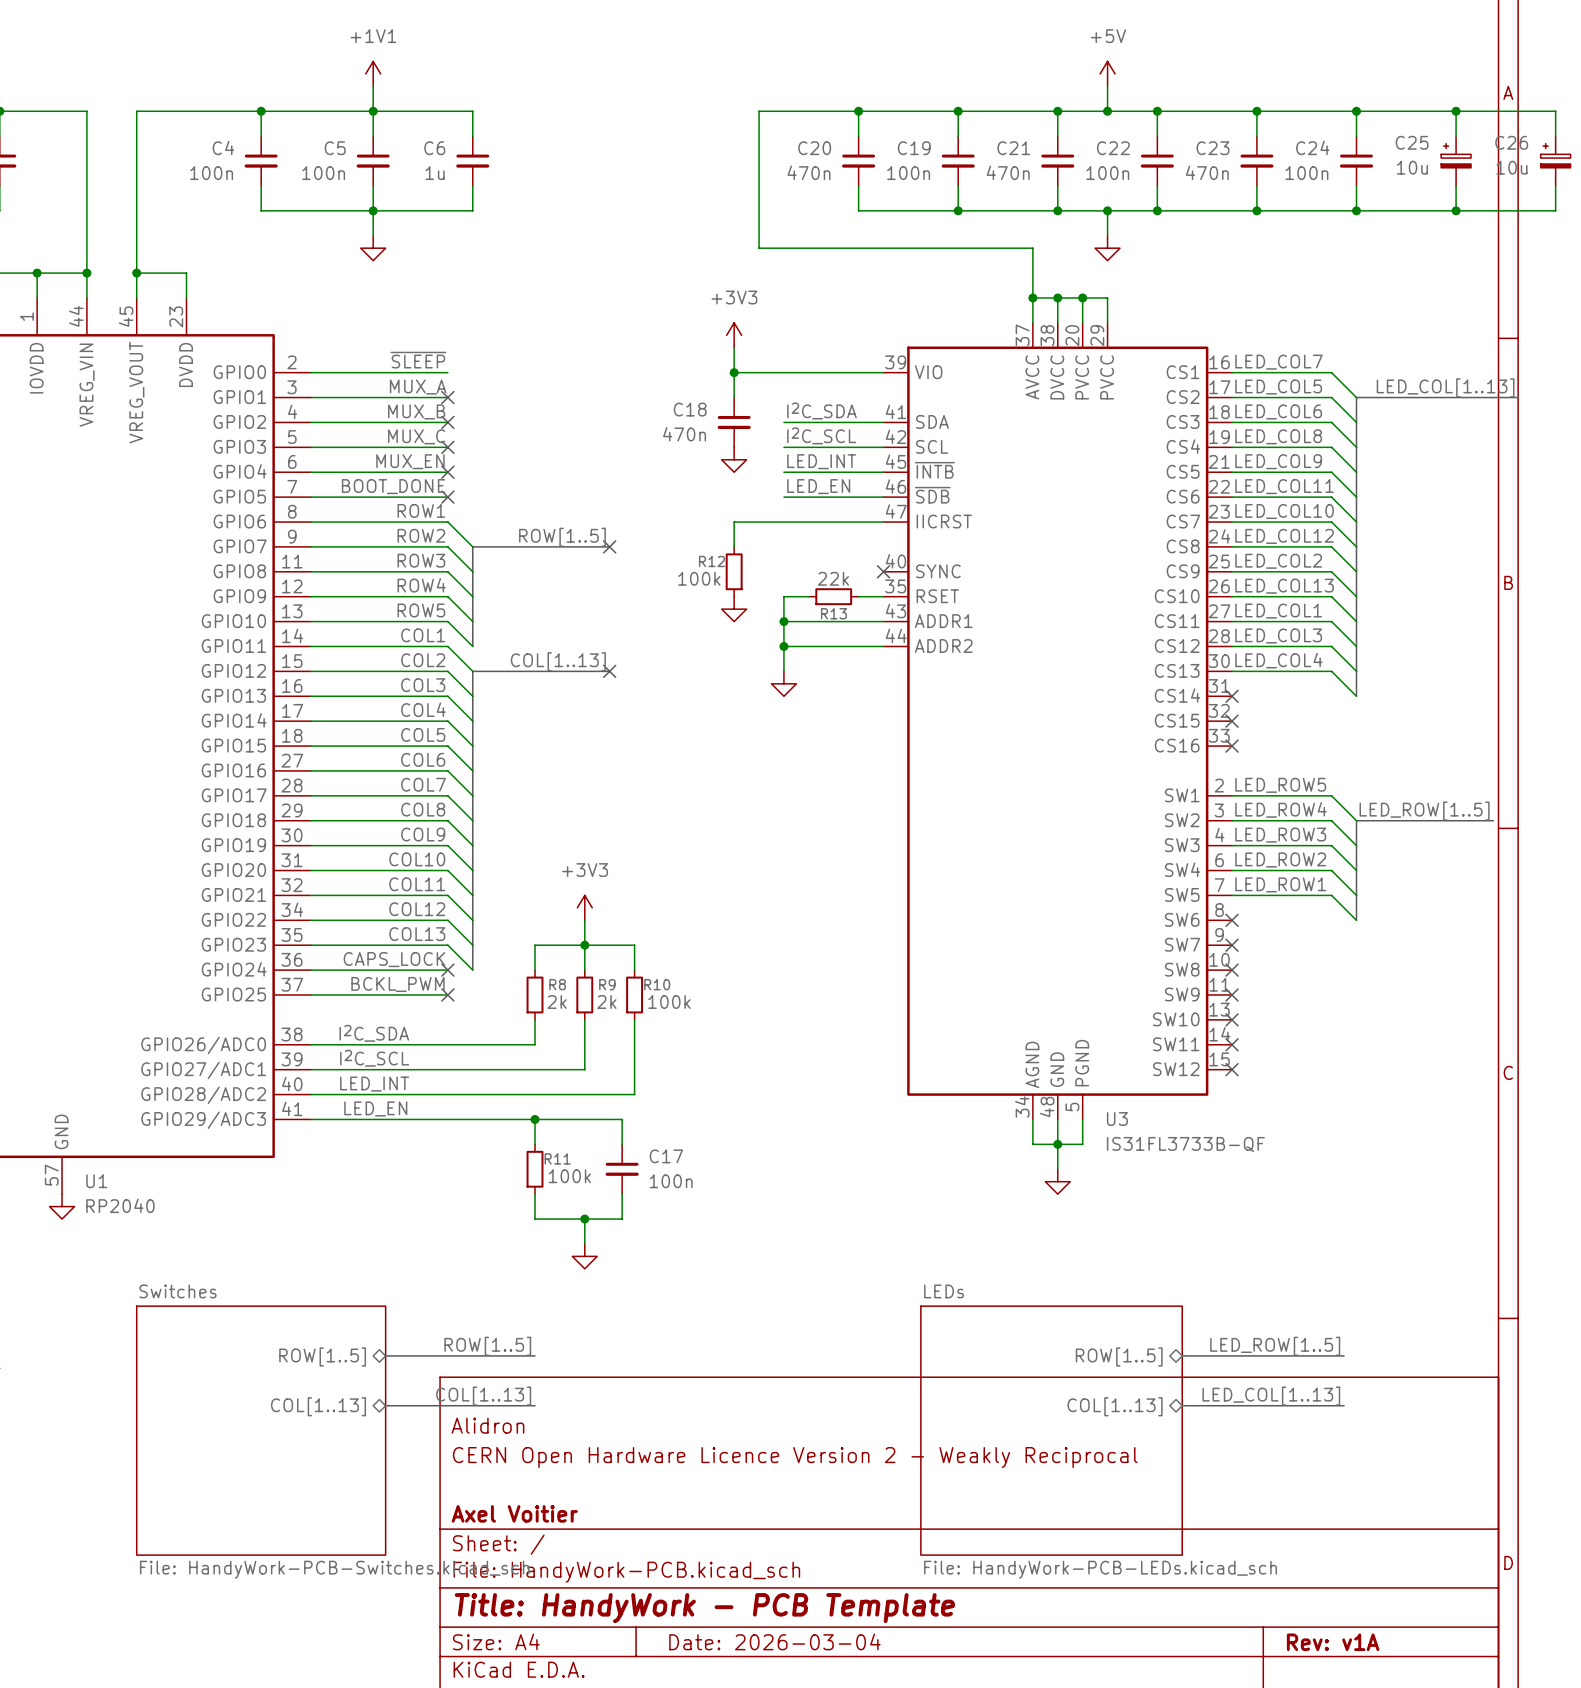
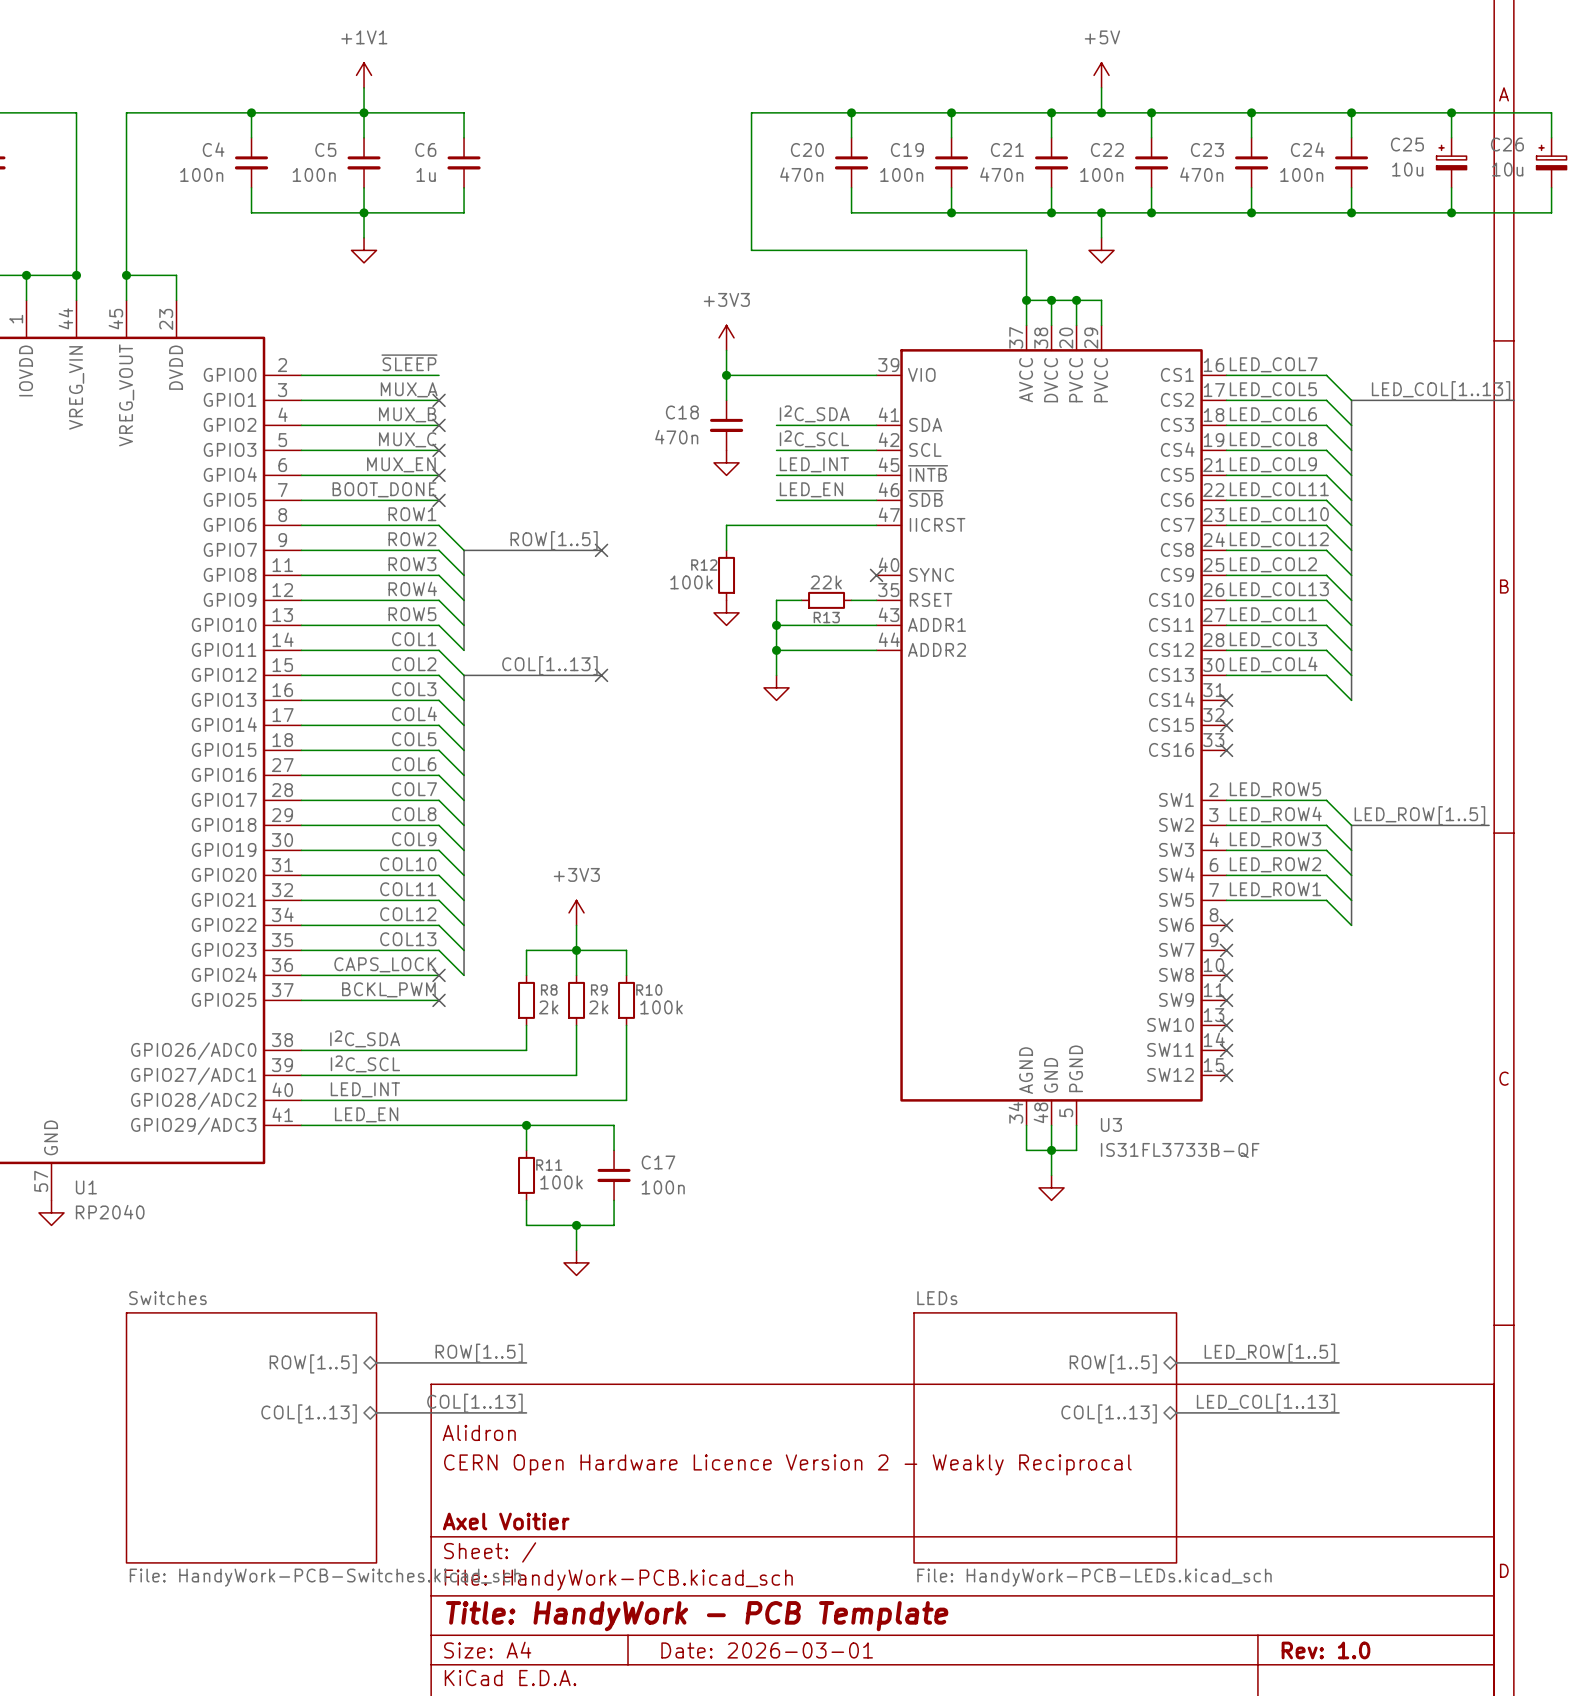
title block: Date: 2026-03-04 (774, 1641) -> Date: 2026-03-01 (767, 1650)
title block: Rev: v1A (1333, 1642) -> Rev: 1.0 (1325, 1650)

